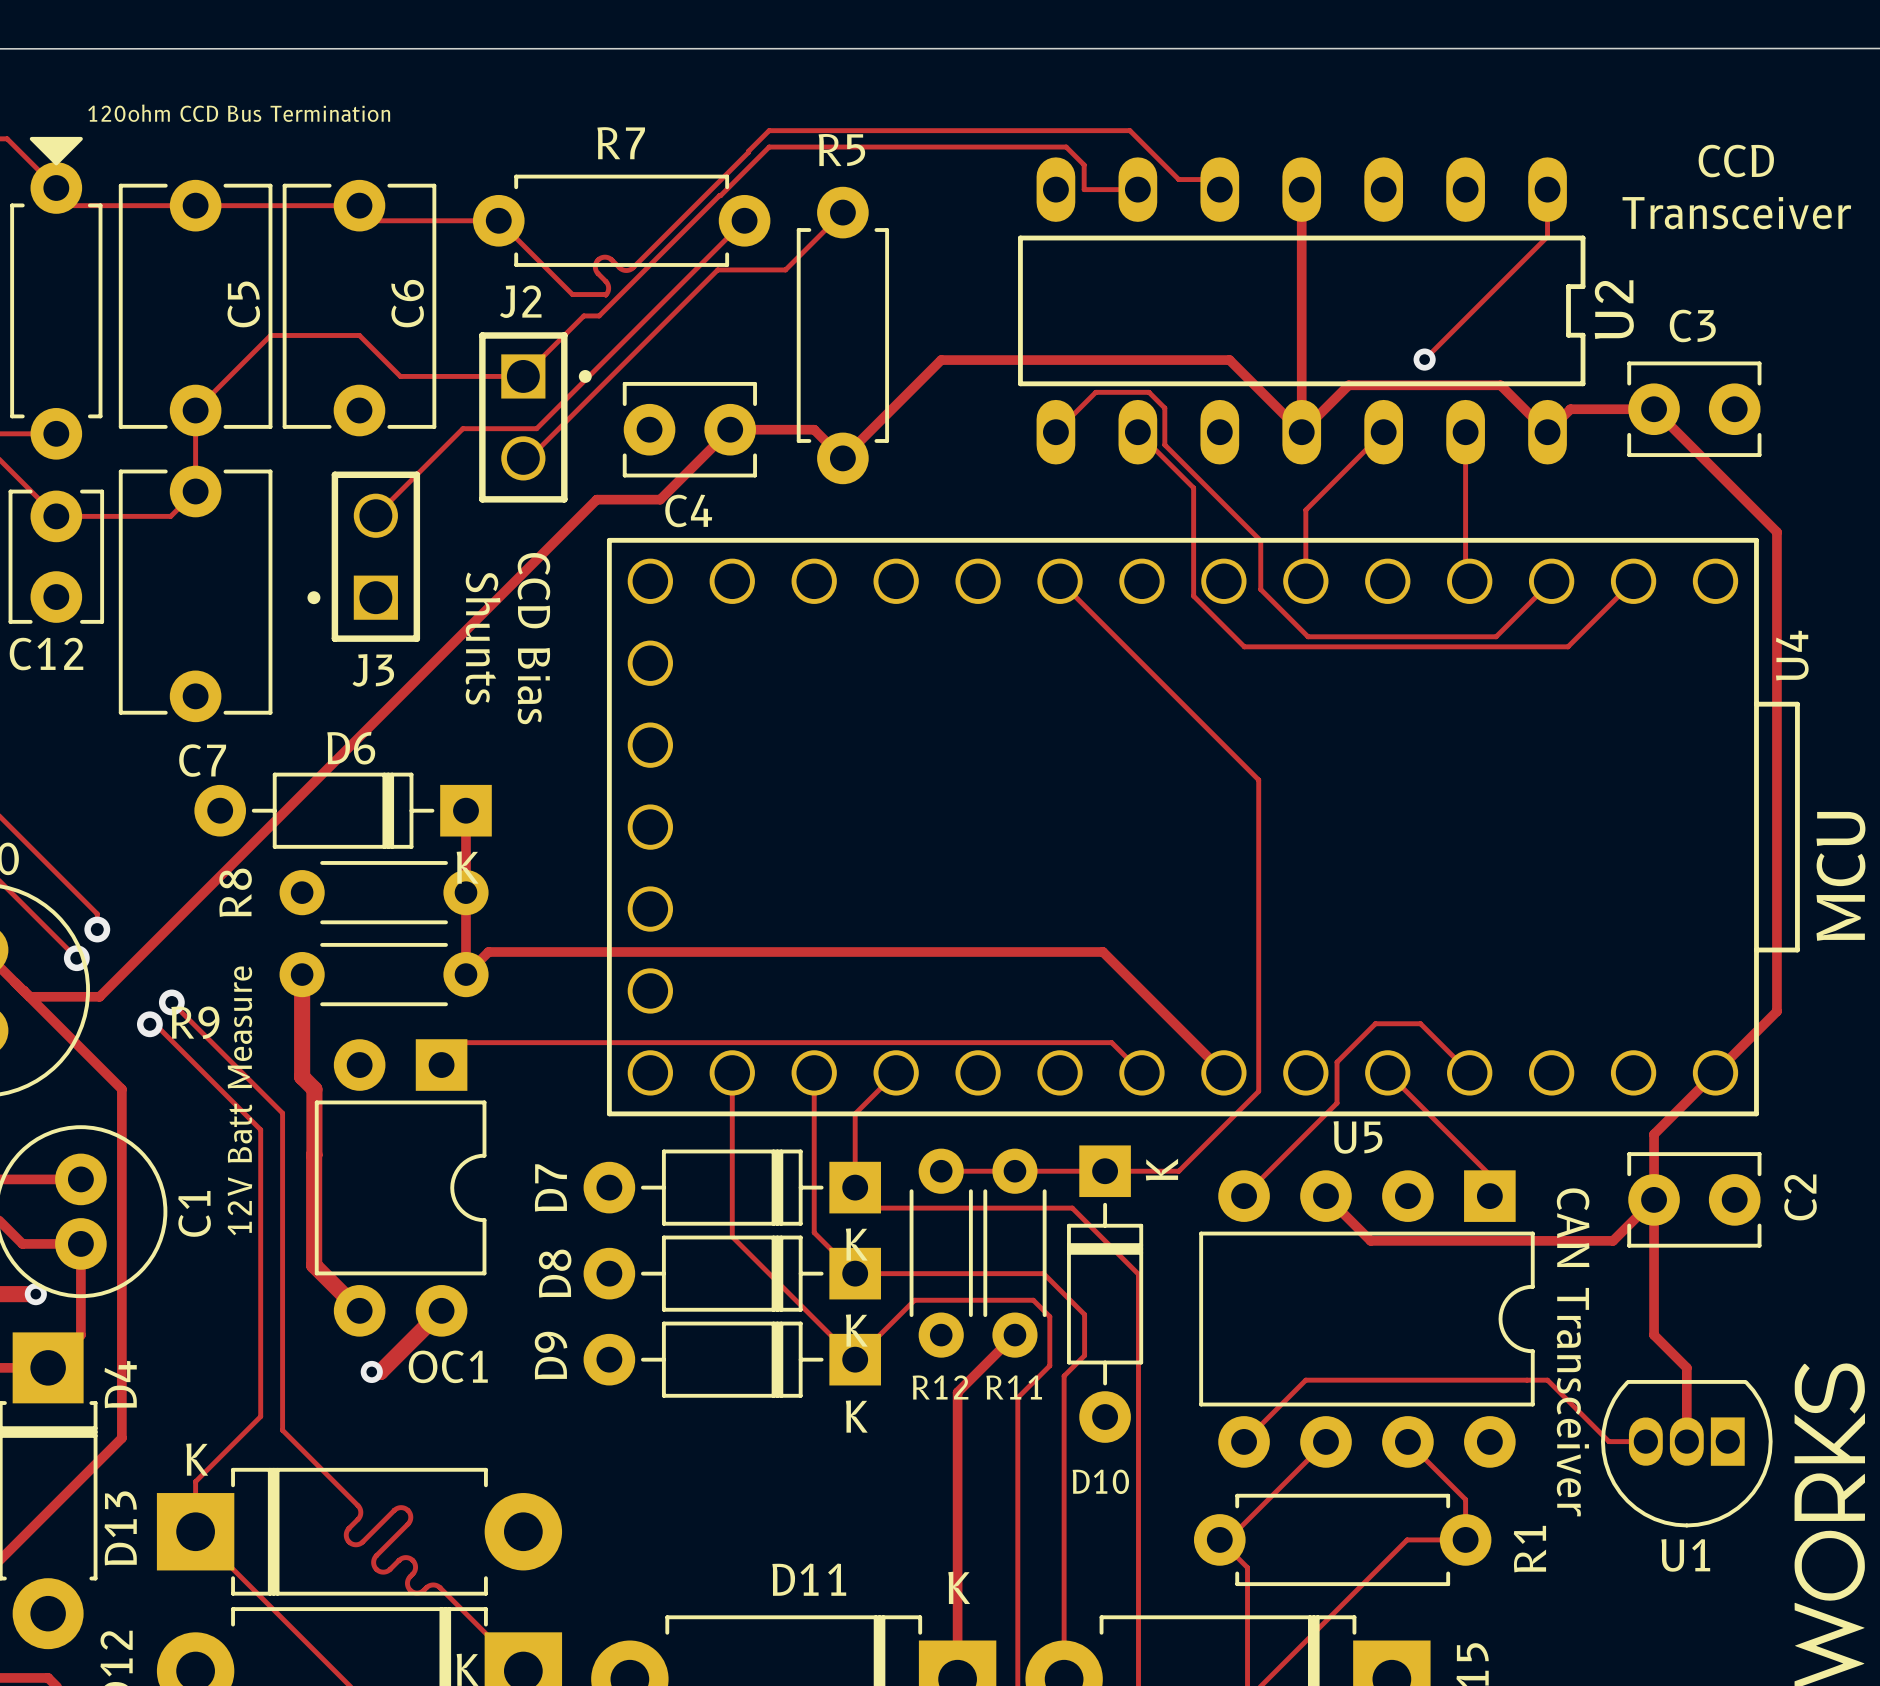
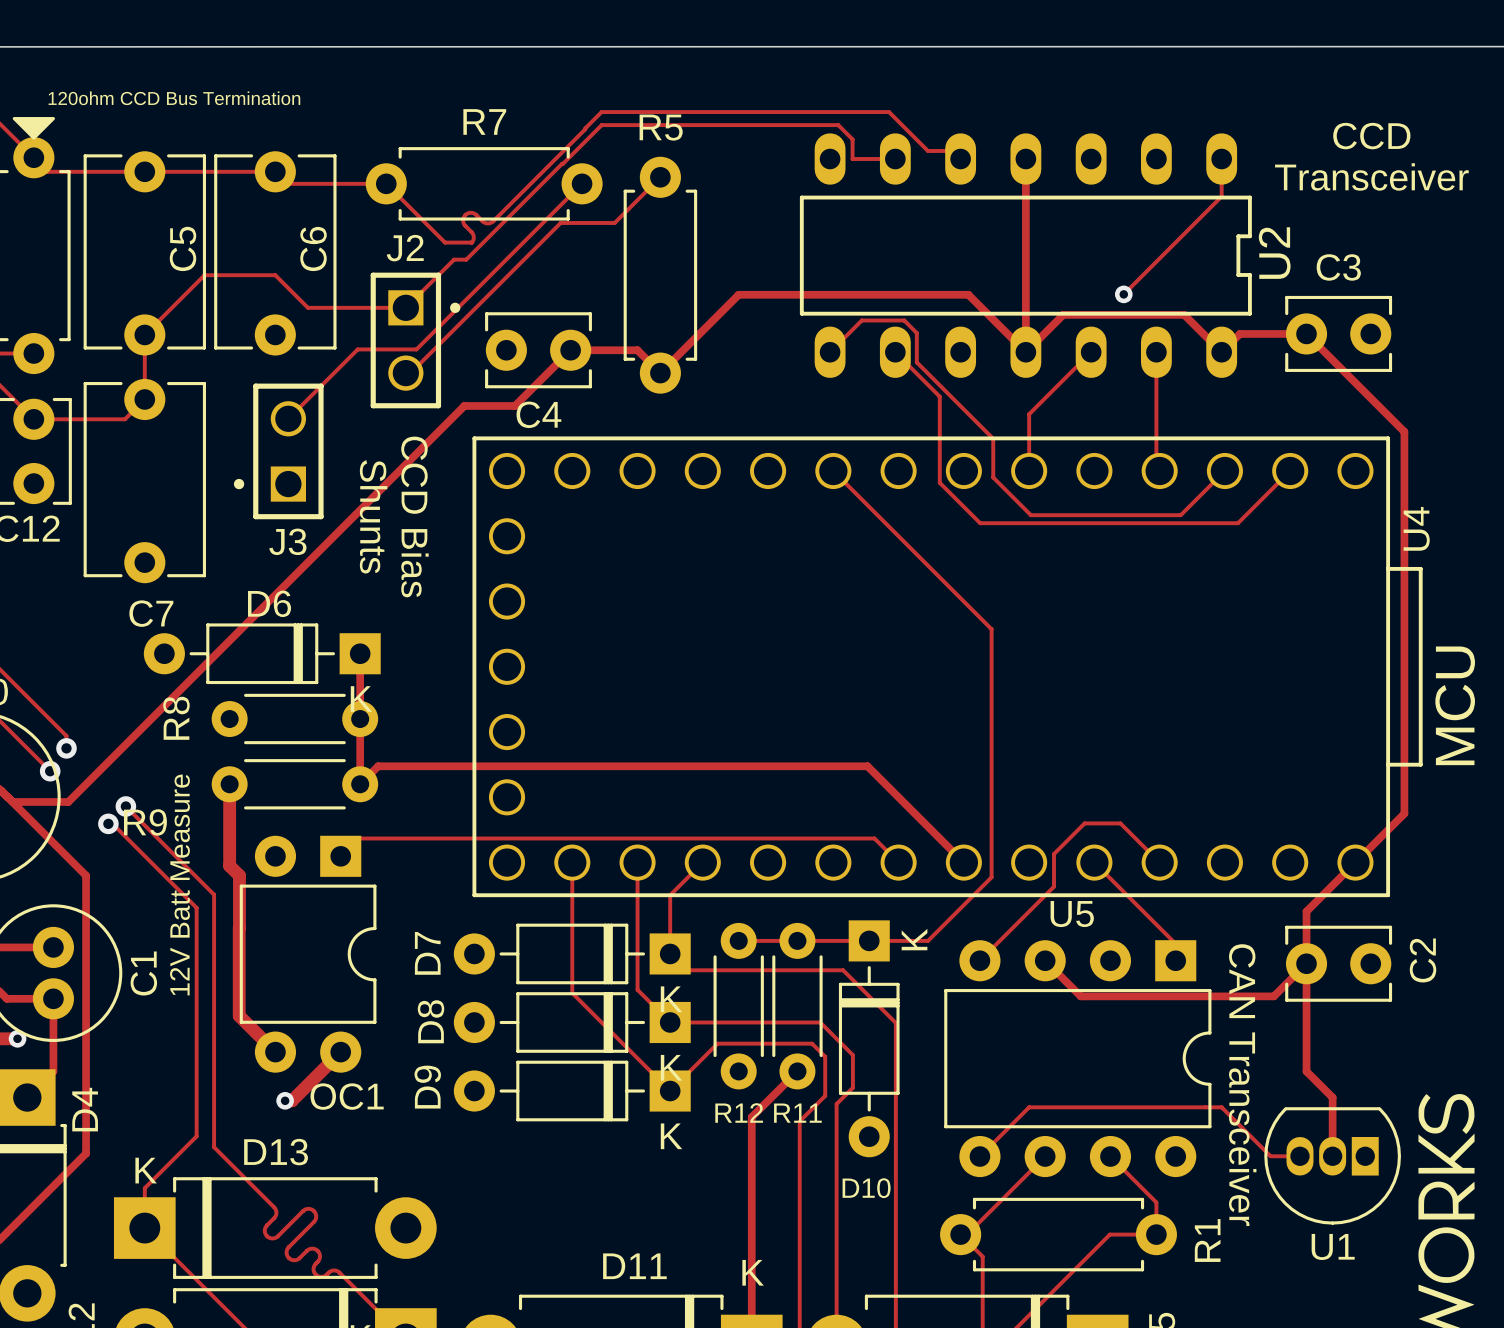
D13 name rotation: 0° (120, 1528) -> 90° clockwise (276, 1152)
D13 name position: D13 (120, 1528) -> D13 (276, 1152)

